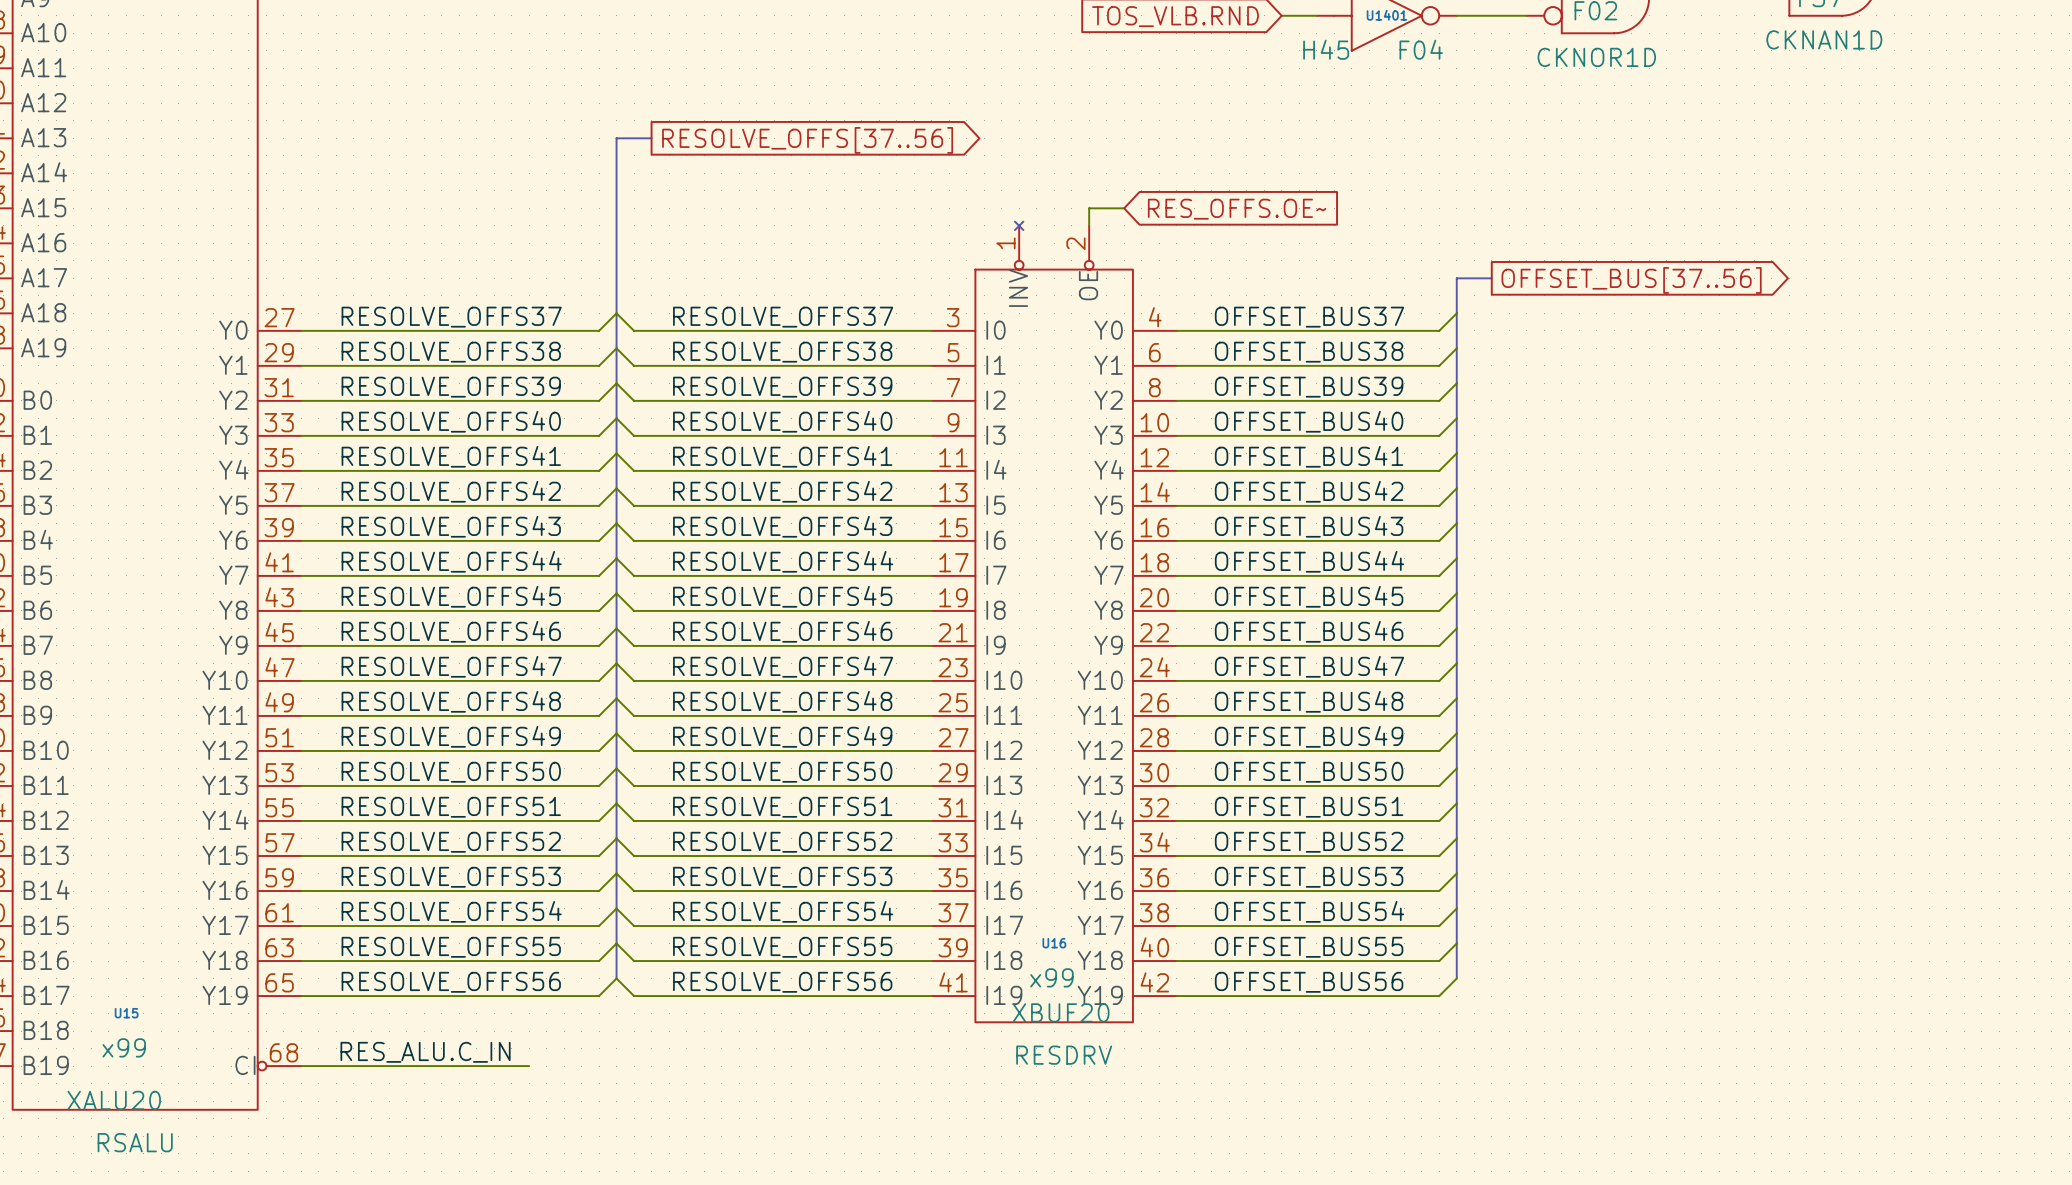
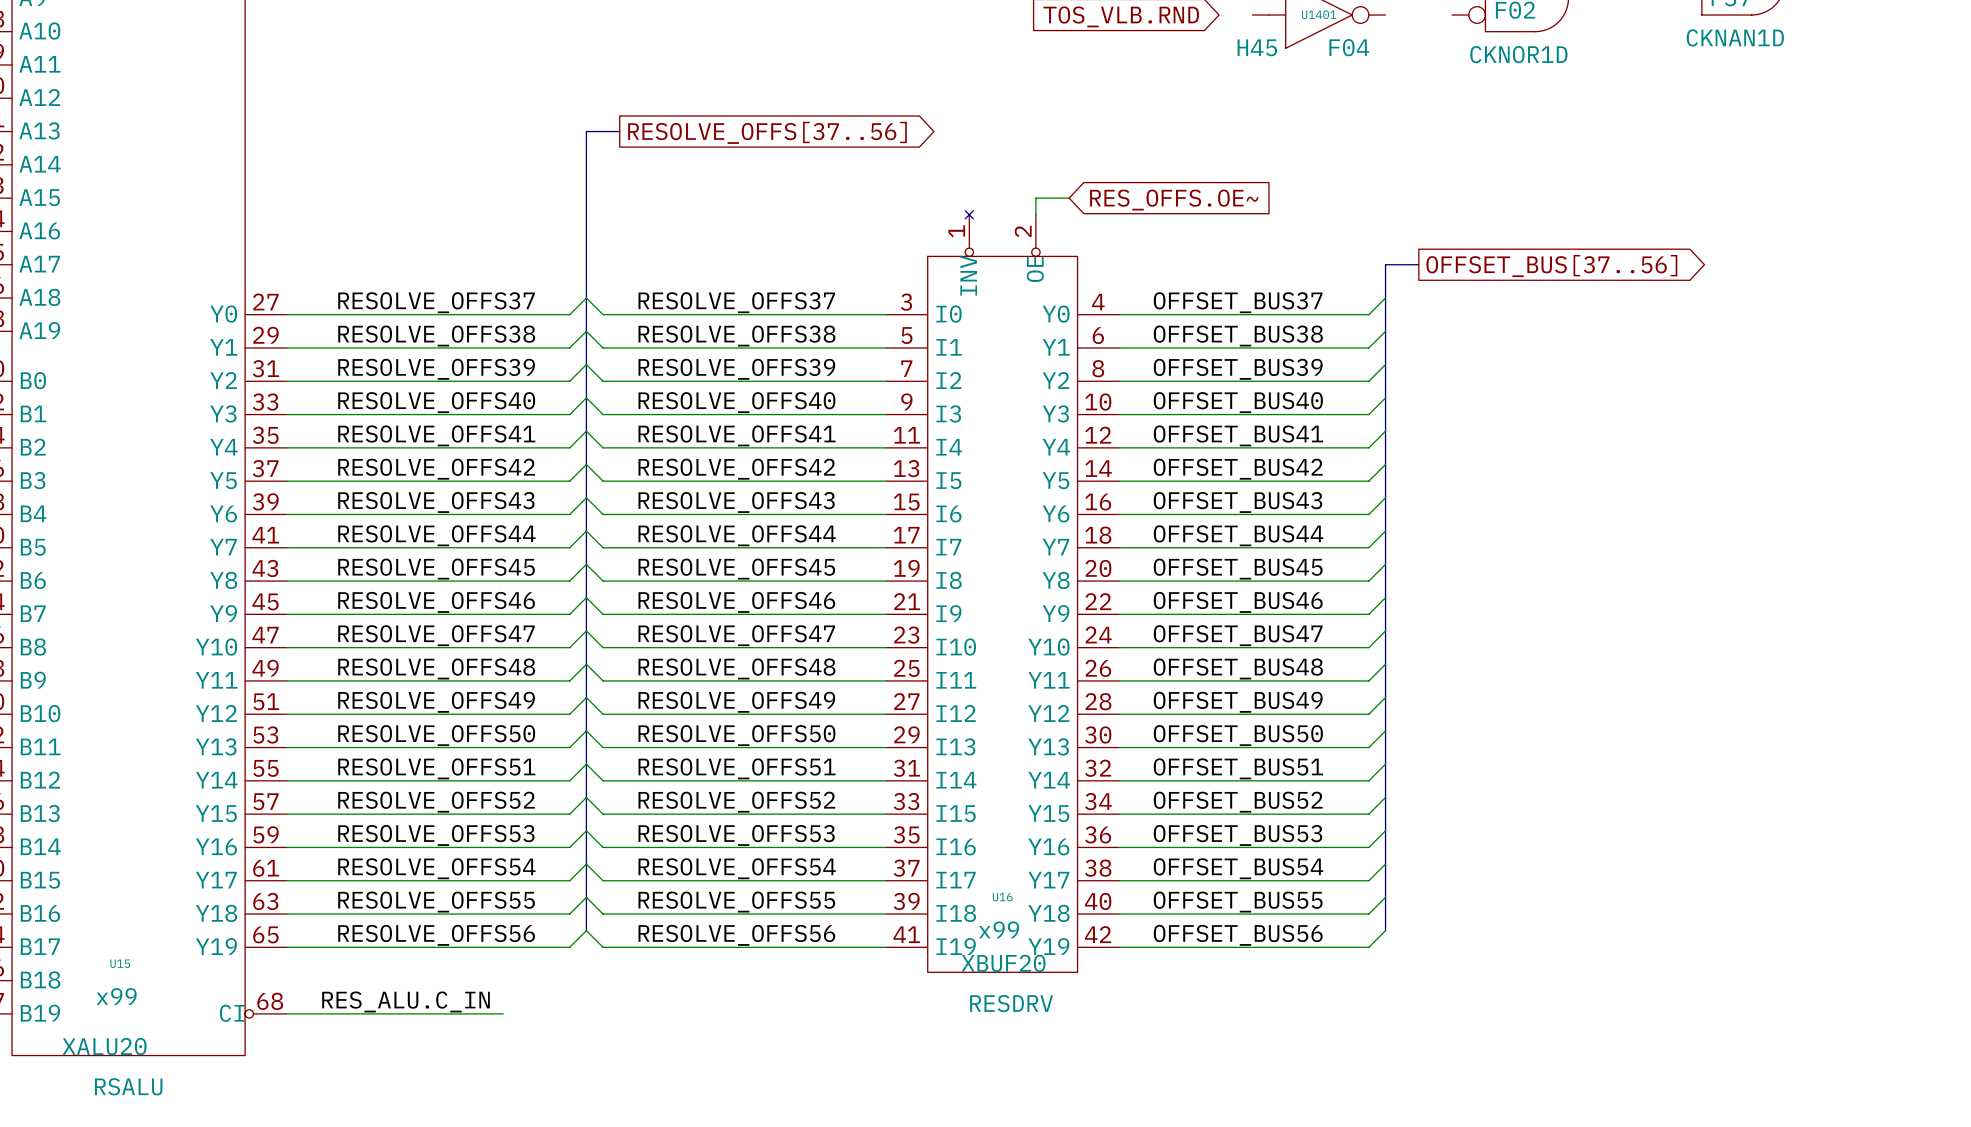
wire: (1281, 15) (1316, 15) -> none
wire: (1456, 15) (1526, 15) -> none

